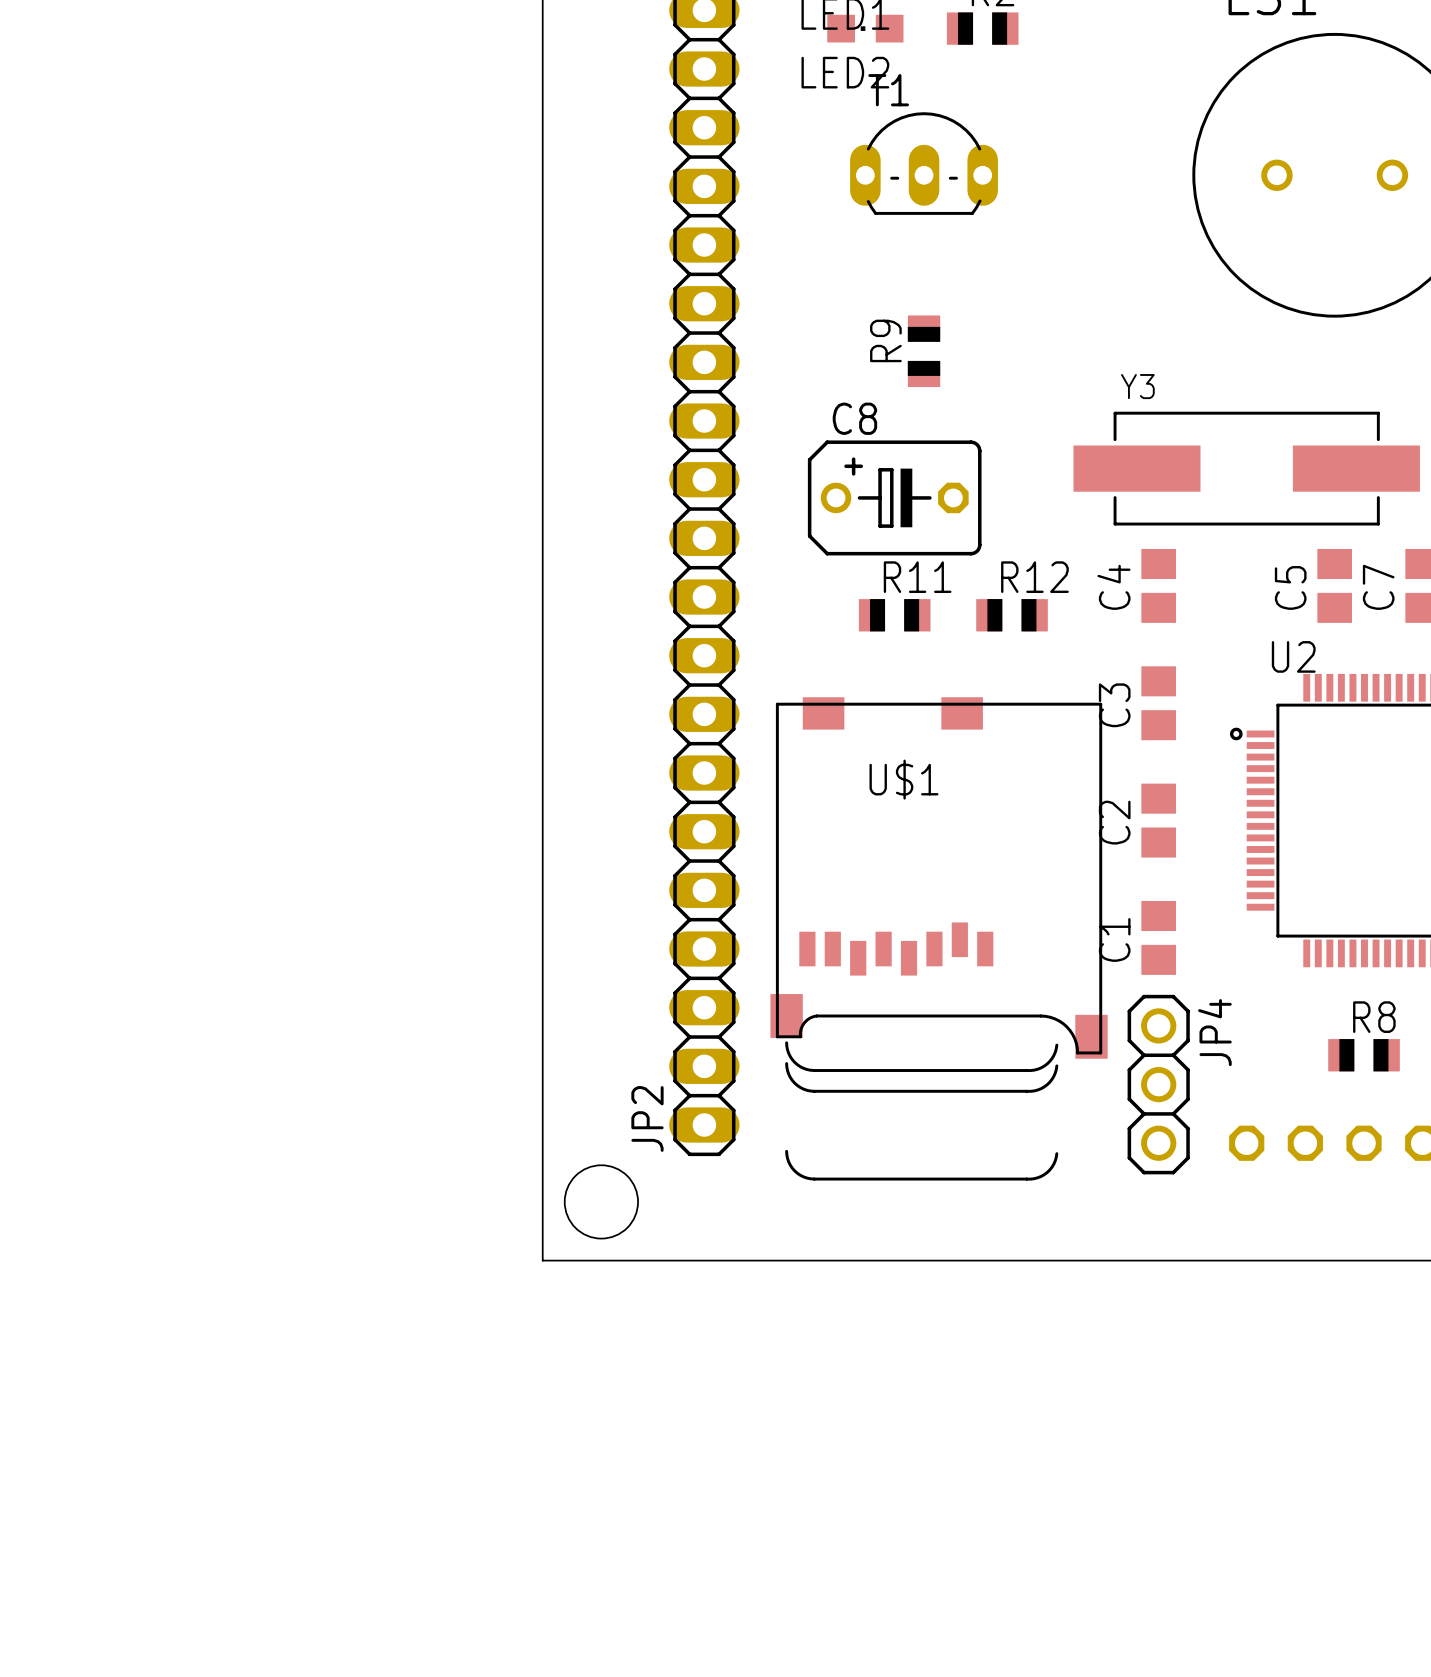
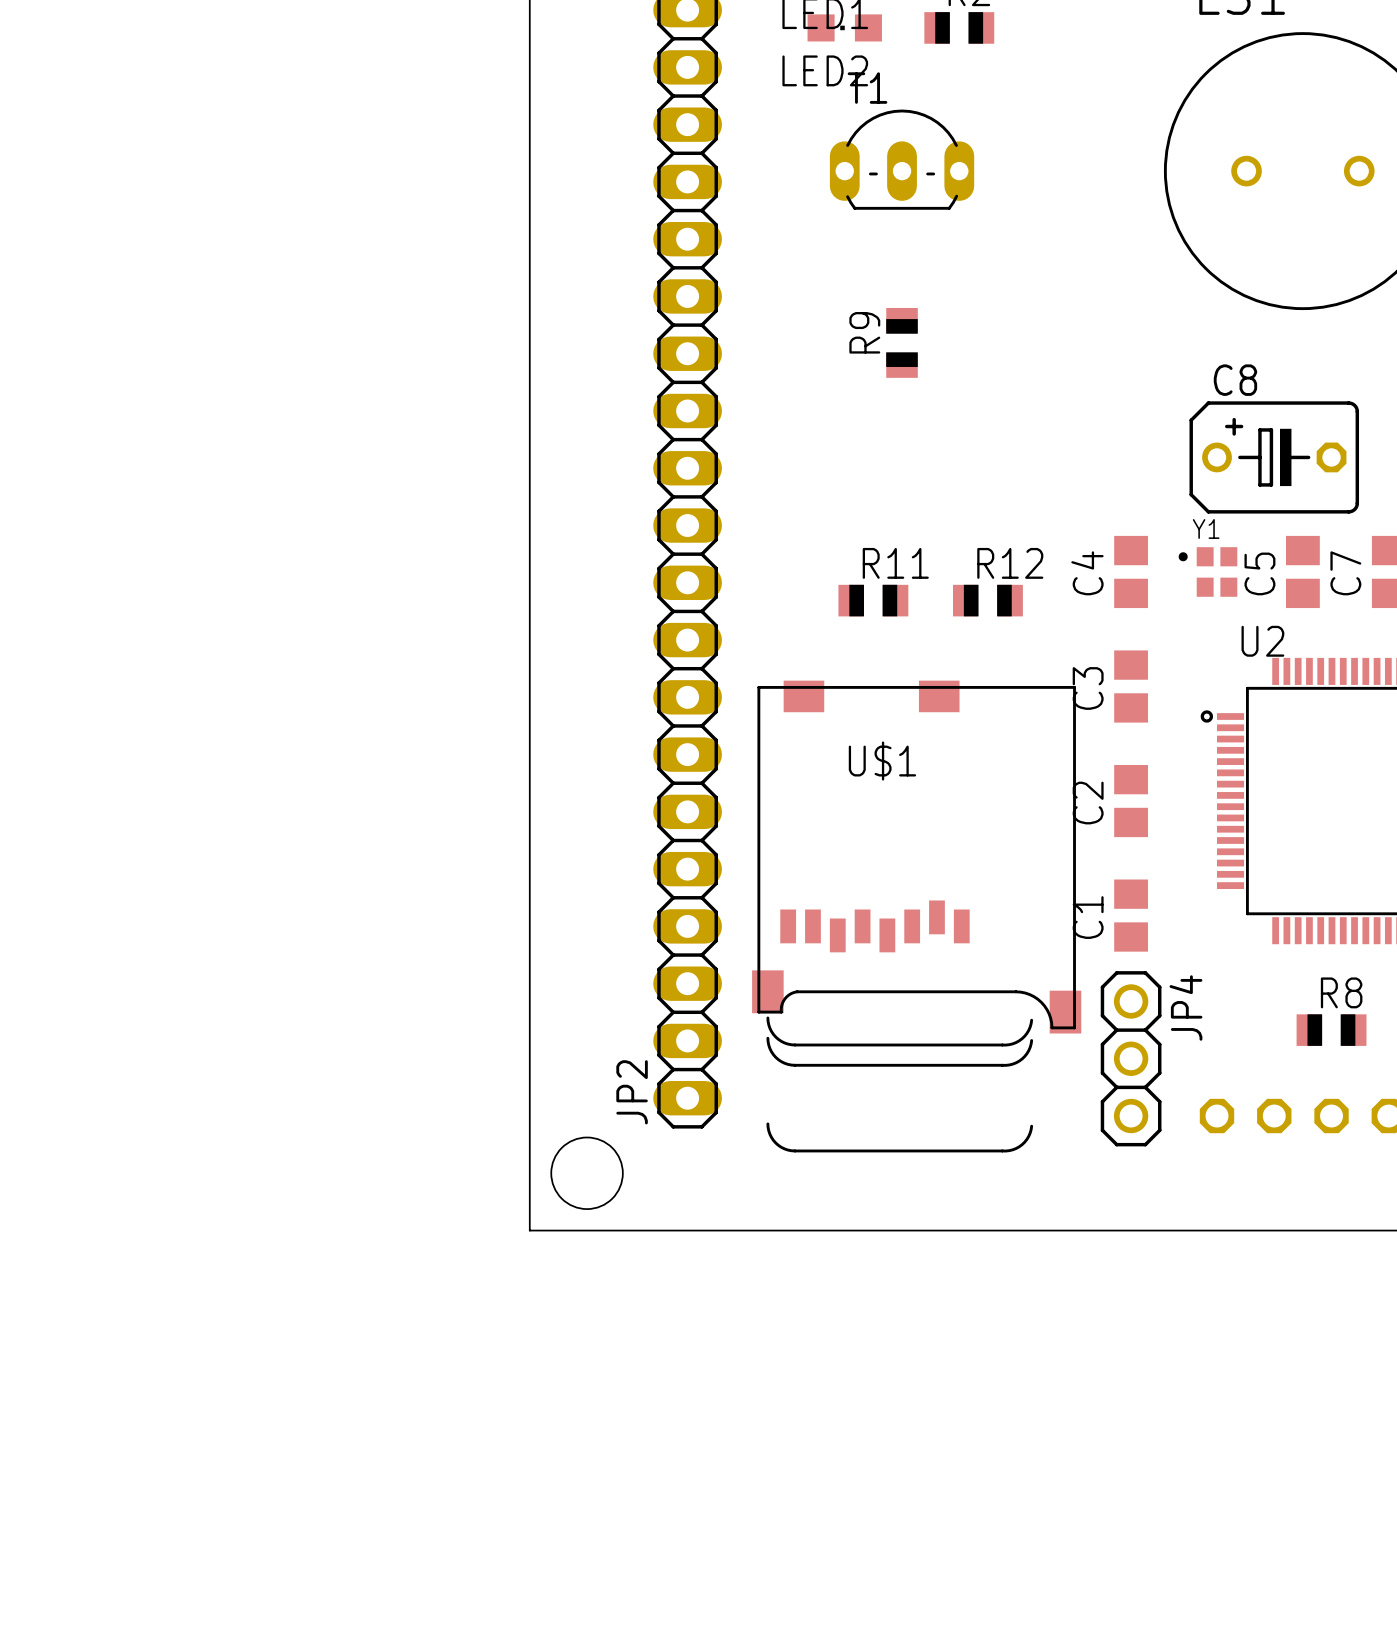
Y3: (1246, 468) -> none
C8 position: (894, 497) -> (1274, 457)
Y1: none -> (1207, 571)

